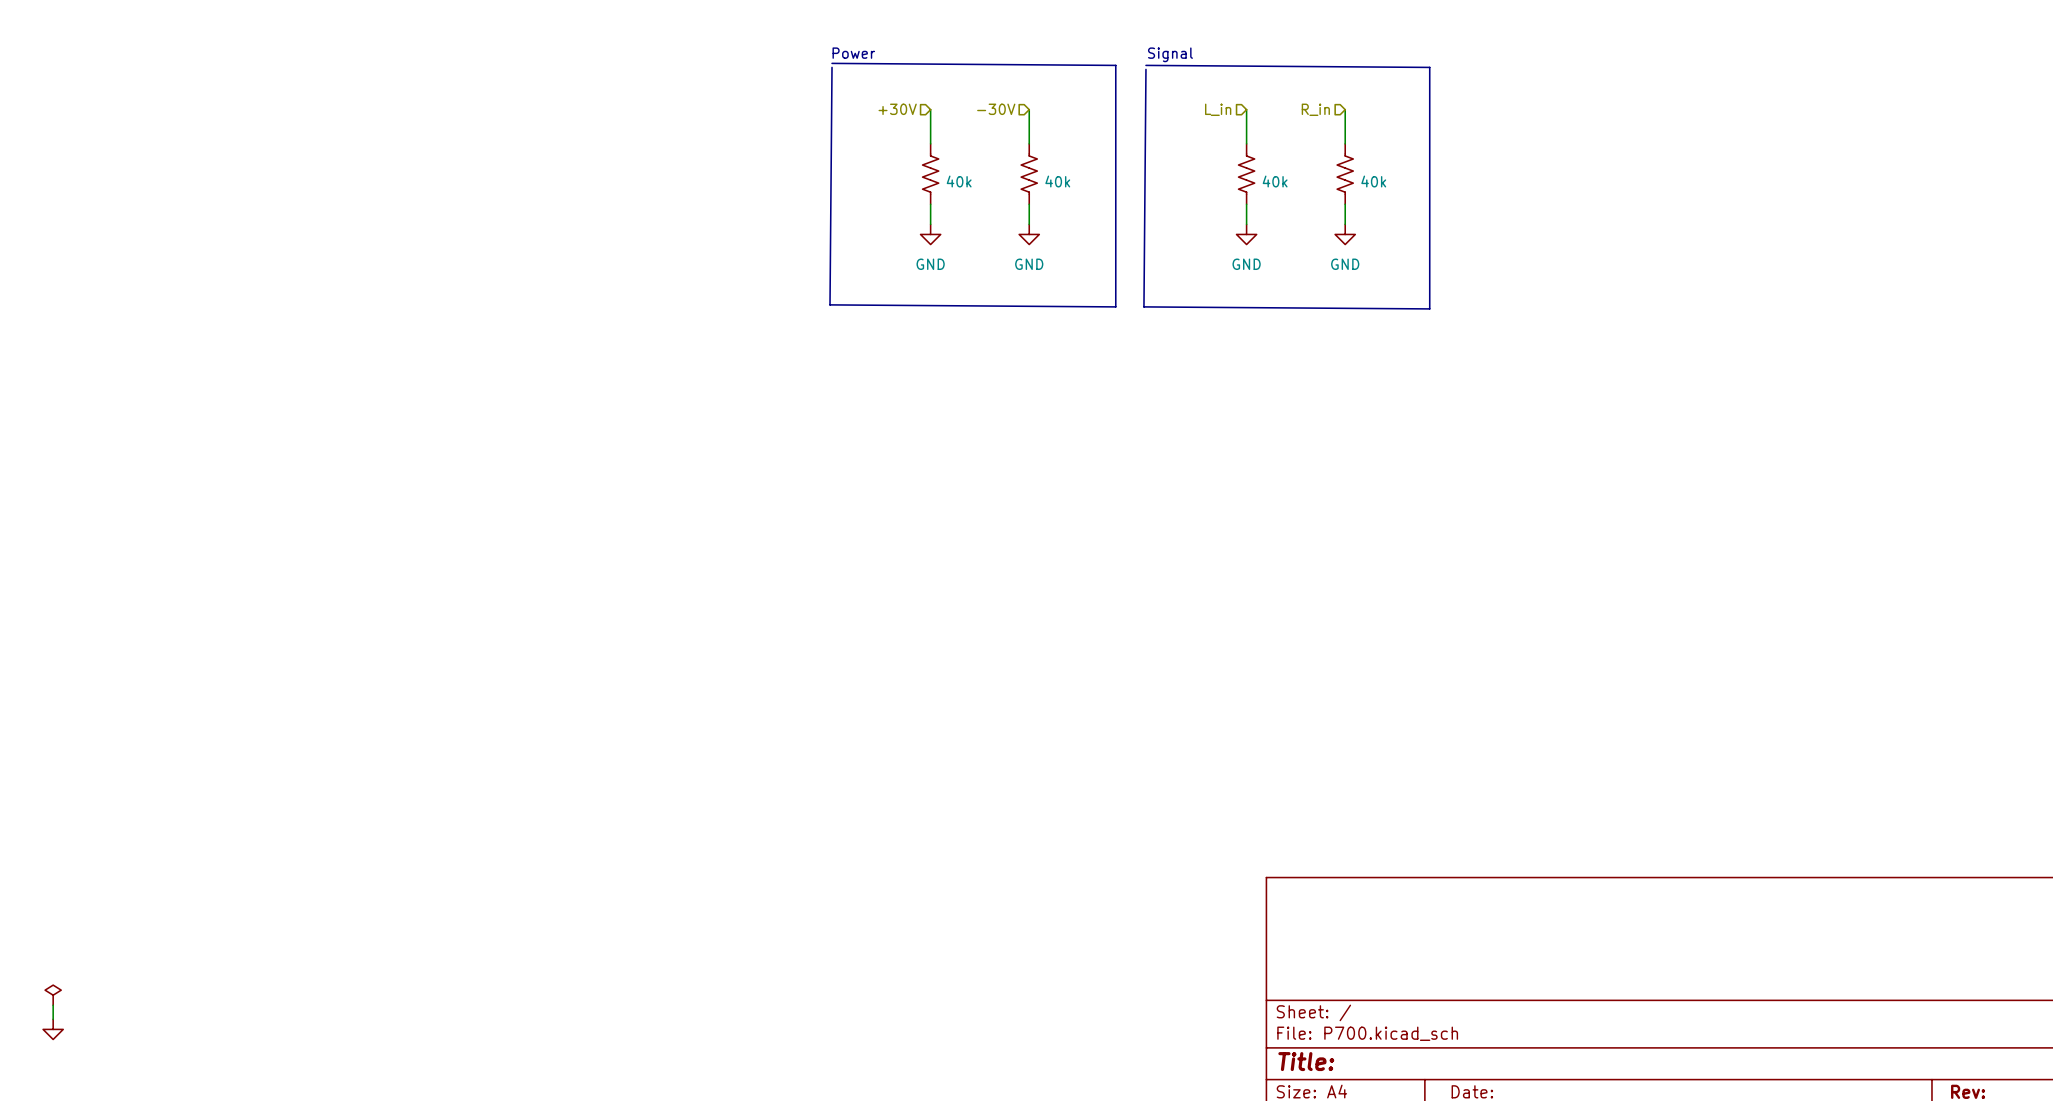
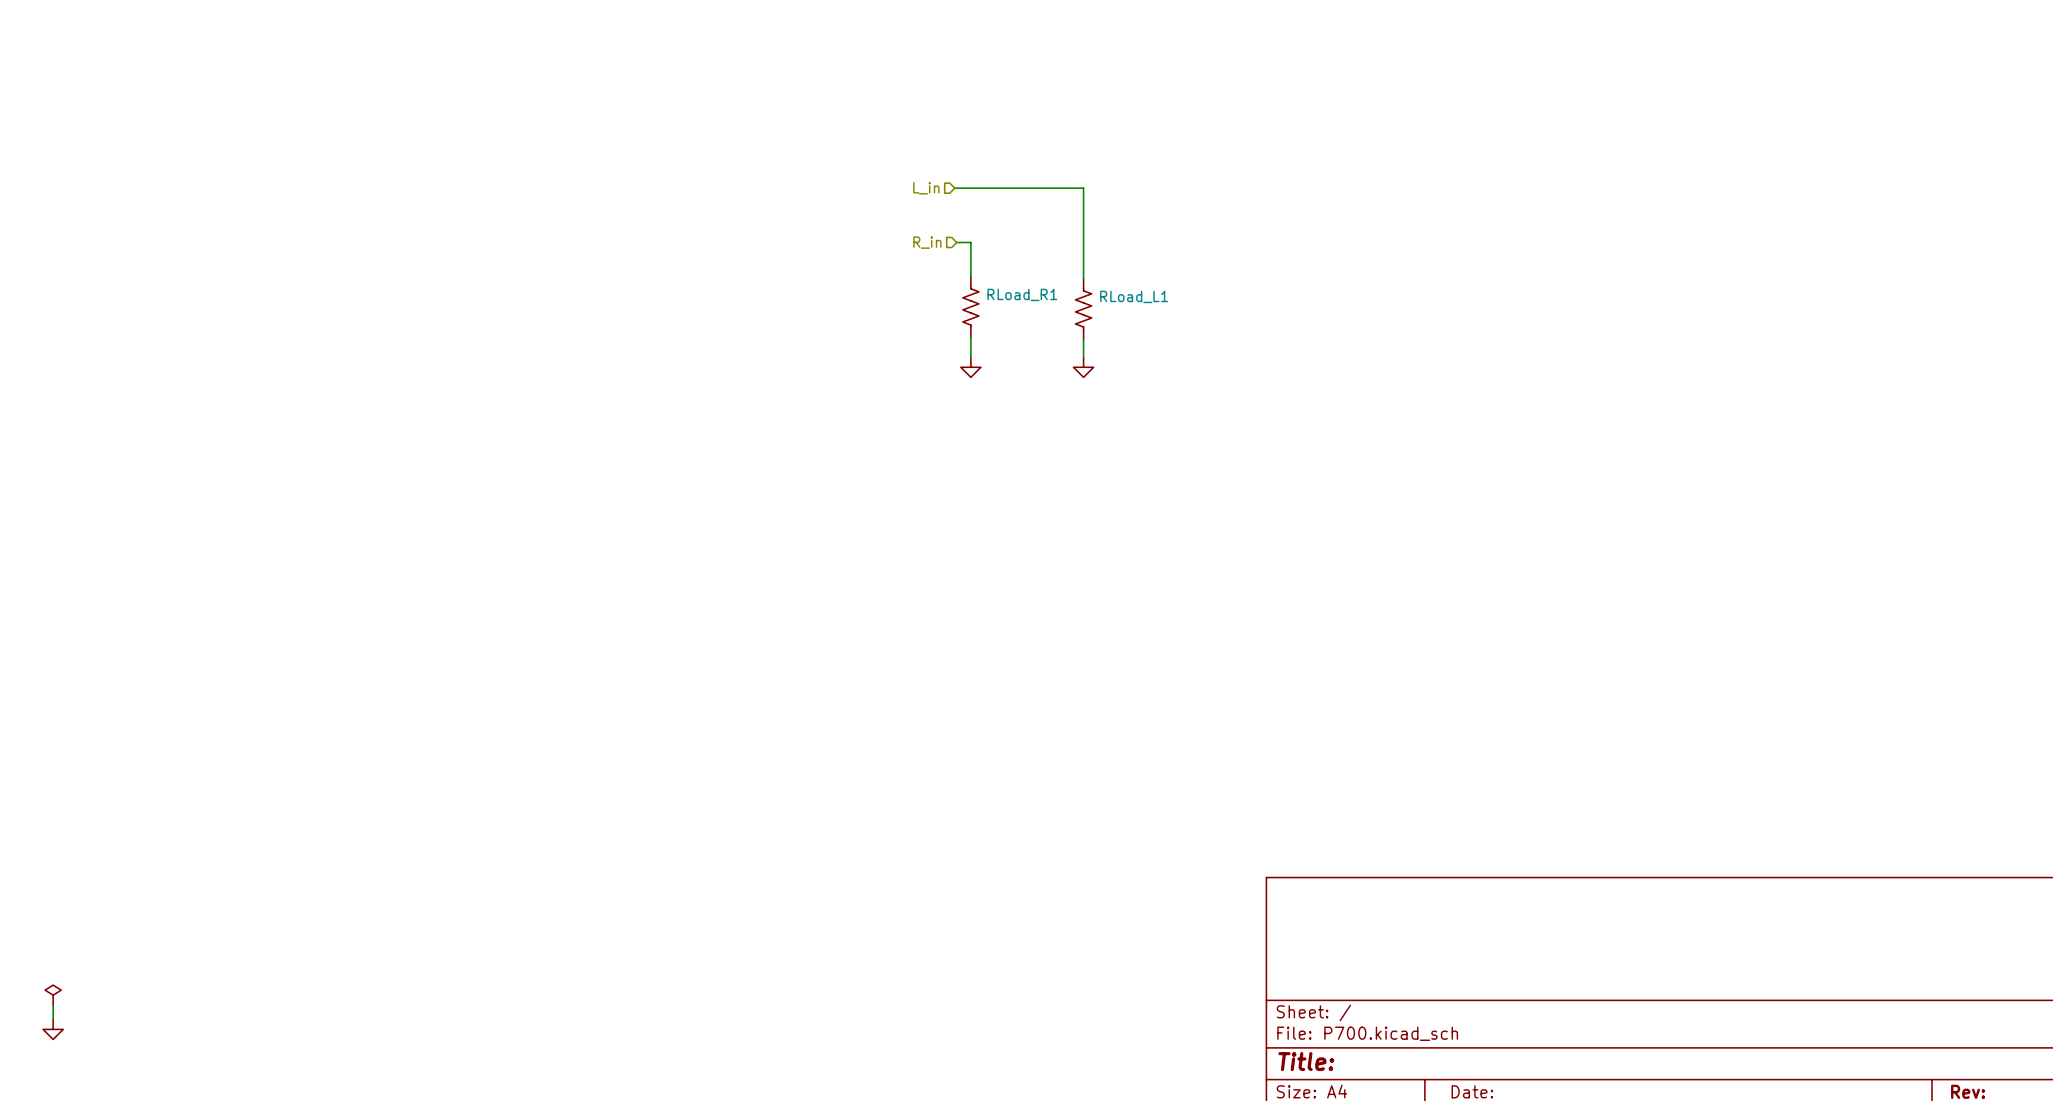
text: Power (853, 53) -> none
text: Signal (1170, 54) -> none
line: (832, 63) (1115, 65) (1115, 306) (830, 304) (832, 67) -> none
line: (1145, 65) (1429, 67) (1429, 308) (1143, 306) (1145, 69) -> none
hierarchical label: +30V (897, 109) -> none
wire: (930, 109) (930, 143) -> none
hierarchical label: -30V (996, 109) -> none
wire: (1029, 109) (1029, 143) -> none
hierarchical label: L_in (1218, 109) -> none
wire: (1246, 109) (1246, 143) -> none
hierarchical label: R_in (1315, 109) -> none
wire: (1345, 109) (1345, 143) -> none
part: 40k (930, 174) -> none
part: 40k (1029, 174) -> none
part: 40k (1246, 174) -> none
part: 40k (1345, 174) -> none
hierarchical label: none -> L_in (926, 188)
wire: none -> (954, 188) (1083, 188) (1083, 278)
wire: (930, 204) (930, 224) -> (970, 337) (970, 357)
wire: (1029, 204) (1029, 224) -> none
wire: (1246, 204) (1246, 224) -> none
wire: (1345, 204) (1345, 224) -> none
power symbol: GND (930, 234) -> none
power symbol: GND (1029, 234) -> none
power symbol: GND (1246, 234) -> none
power symbol: GND (1345, 234) -> none
hierarchical label: none -> R_in (927, 242)
wire: none -> (956, 242) (970, 242) (970, 276)
RLoad_R1: none -> (970, 306)
RLoad_L1: none -> (1083, 308)
wire: none -> (1083, 339) (1083, 357)
power symbol: none -> (970, 367)
power symbol: none -> (1083, 367)

